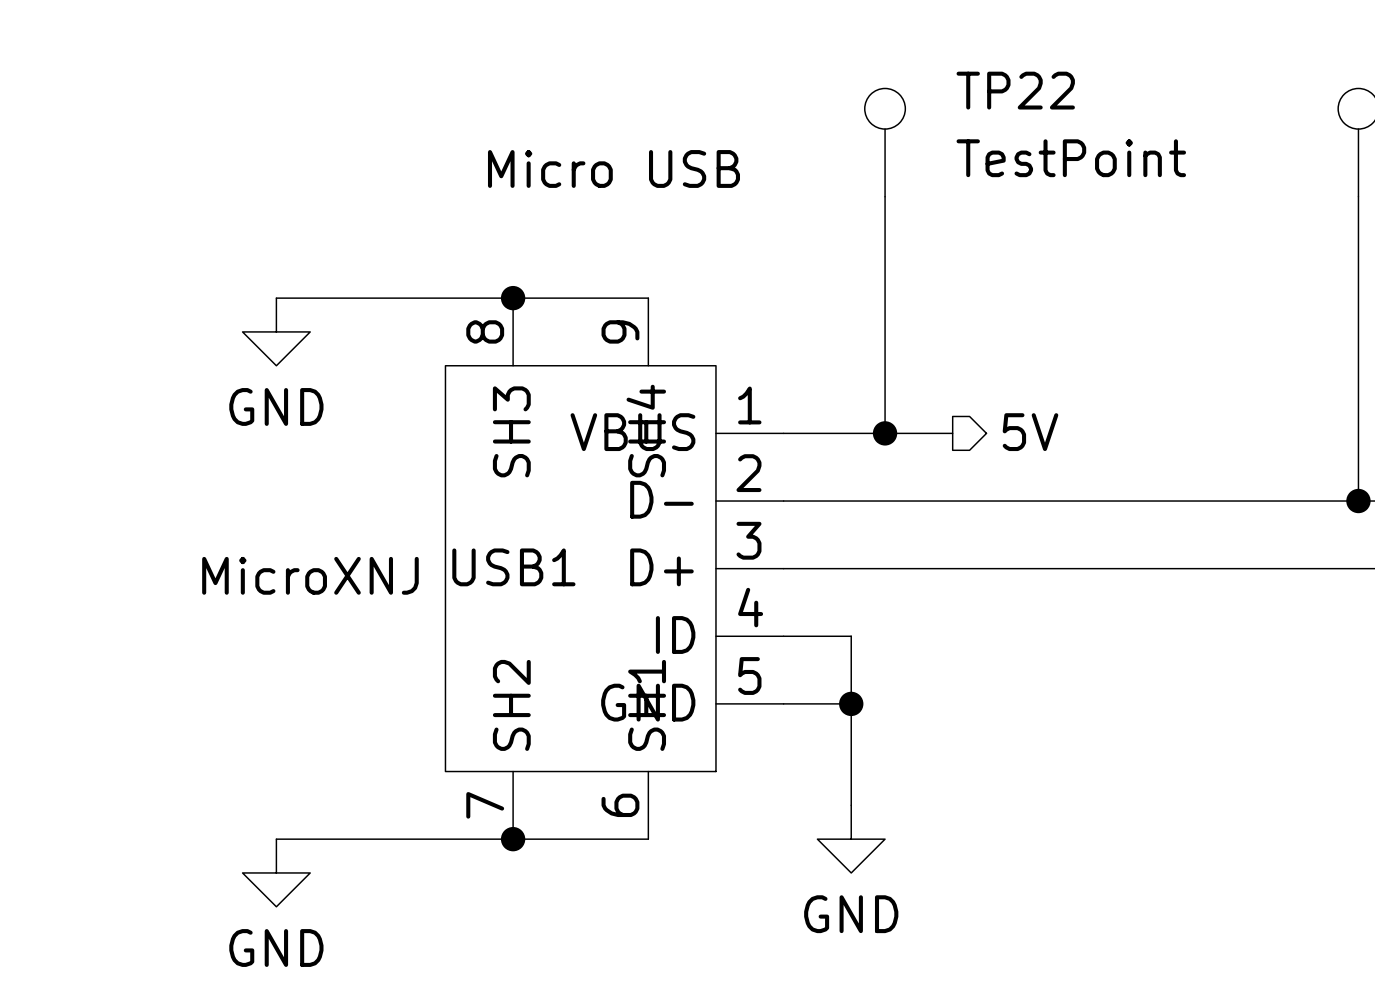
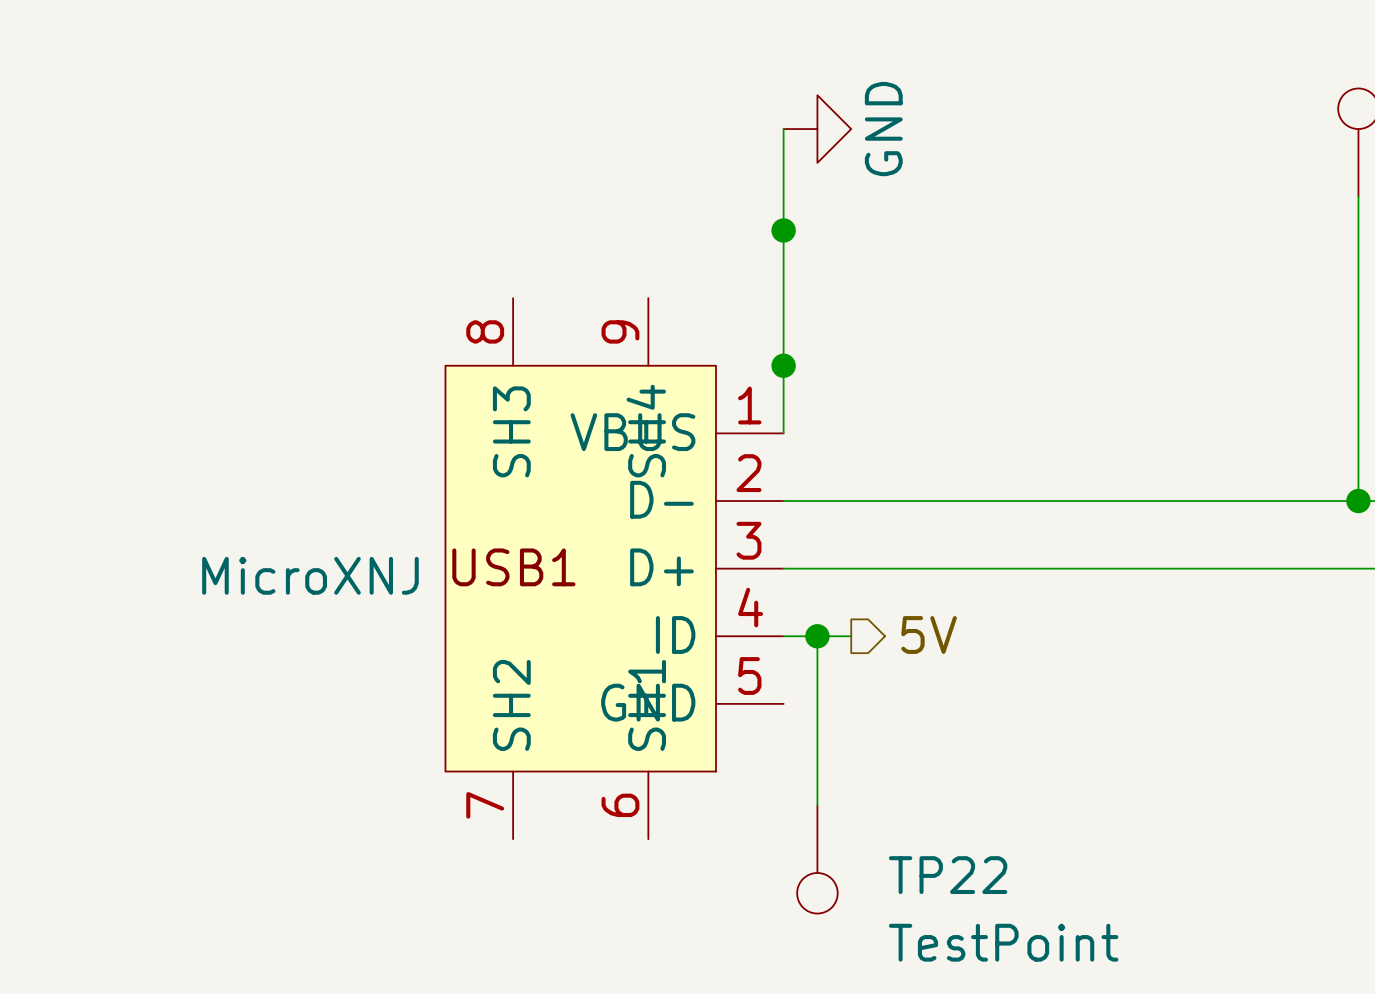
TP22 name position: TP22 (1015, 90) -> TP22 (948, 875)
TP22 rotation: 0° (885, 108) -> 180° (817, 893)
power symbol: none -> GND (817, 129)
TP22 position: (885, 142) -> (817, 859)
TP22 value position: TestPoint (1071, 158) -> TestPoint (1003, 942)
text: Micro USB (613, 168) -> none
wire: (885, 196) (885, 433) -> none
junction: none -> (783, 230)
wire: (276, 298) (648, 298) -> none
junction: (513, 298) -> none
power symbol: GND (276, 331) -> none
junction: none -> (783, 365)
hierarchical label position: 5V (1030, 432) -> 5V (929, 635)
wire: (783, 433) (952, 433) -> (783, 433) (783, 129)
junction: (885, 433) -> none
wire: (851, 636) (851, 805) -> (817, 636) (817, 805)
wire: (783, 703) (851, 703) -> none
junction position: (851, 703) -> (817, 636)
wire: (276, 839) (648, 839) -> none
junction: (513, 839) -> none
power symbol: GND (851, 839) -> none
power symbol: GND (276, 872) -> none

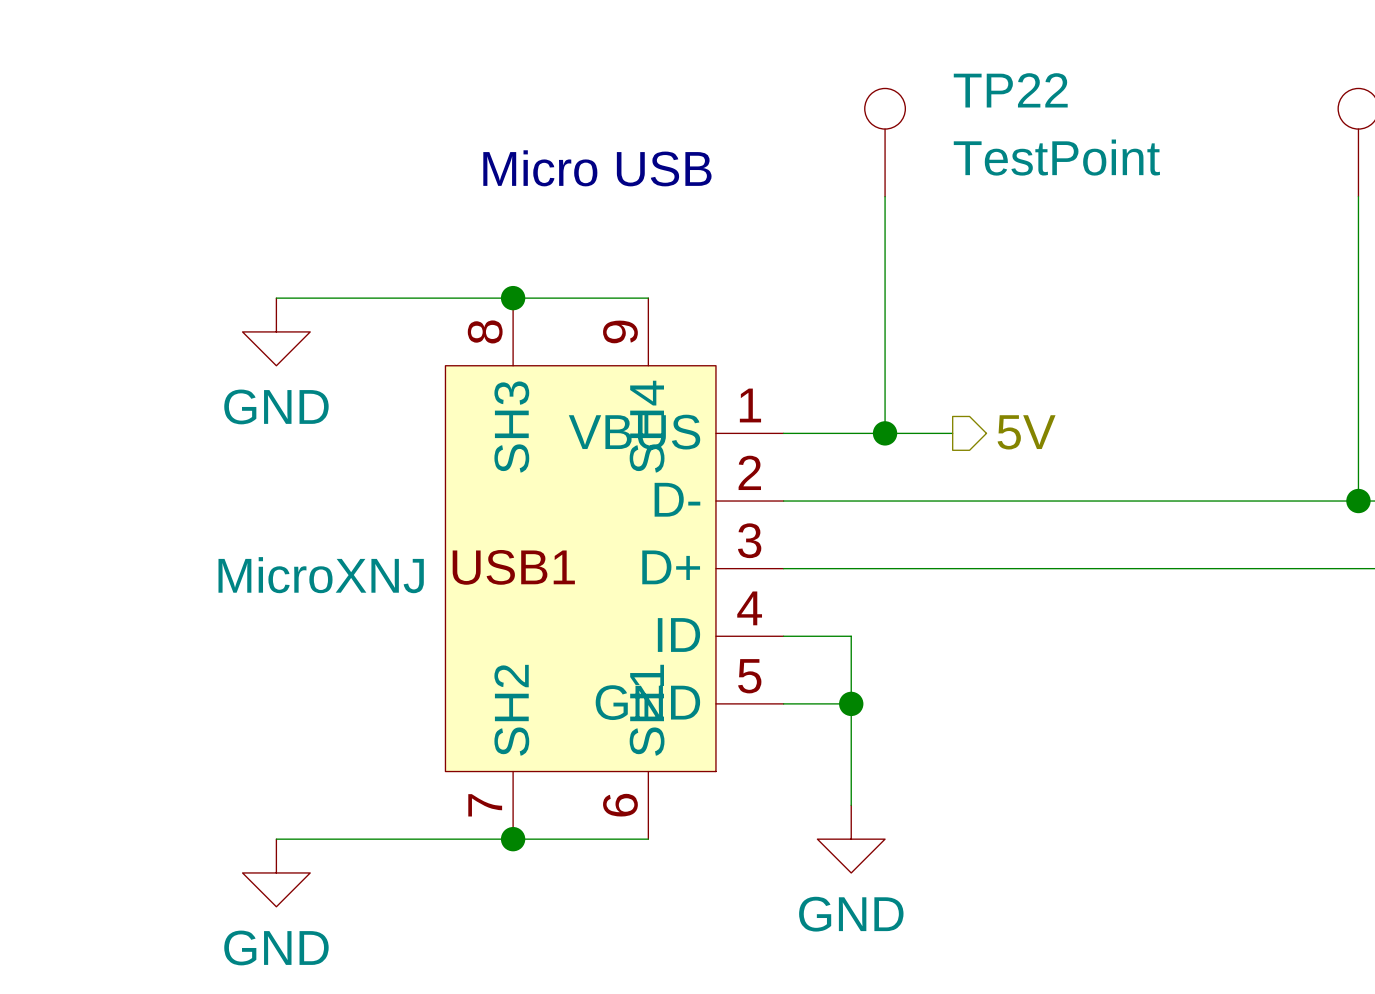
wire: (783, 129) (783, 433) -> (952, 433) (783, 433)
power symbol: GND (817, 129) -> none
text: none -> Micro USB (597, 168)
wire: none -> (885, 196) (885, 433)
junction: (783, 230) -> none
wire: none -> (276, 298) (648, 298)
junction: none -> (513, 298)
power symbol: none -> GND (276, 331)
junction: (783, 365) -> none
junction: none -> (885, 433)
hierarchical label position: 5V (929, 635) -> 5V (1026, 432)
wire: (817, 636) (817, 805) -> (851, 636) (851, 805)
junction position: (817, 636) -> (851, 703)
wire: none -> (783, 703) (851, 703)
wire: none -> (276, 839) (648, 839)
junction: none -> (513, 839)
power symbol: none -> GND (851, 839)
TP22 position: (817, 859) -> (885, 142)
power symbol: none -> GND (276, 872)
TP22 name position: TP22 (948, 875) -> TP22 (1010, 90)
TP22 rotation: 0° (817, 893) -> 180° (885, 108)
TP22 value position: TestPoint (1003, 942) -> TestPoint (1056, 157)

